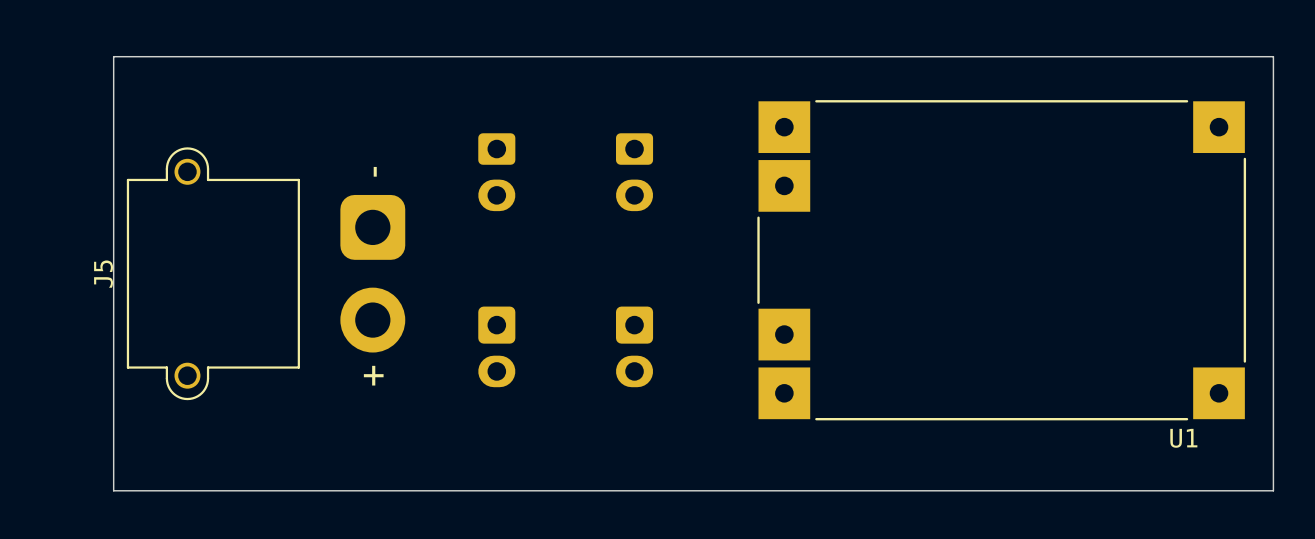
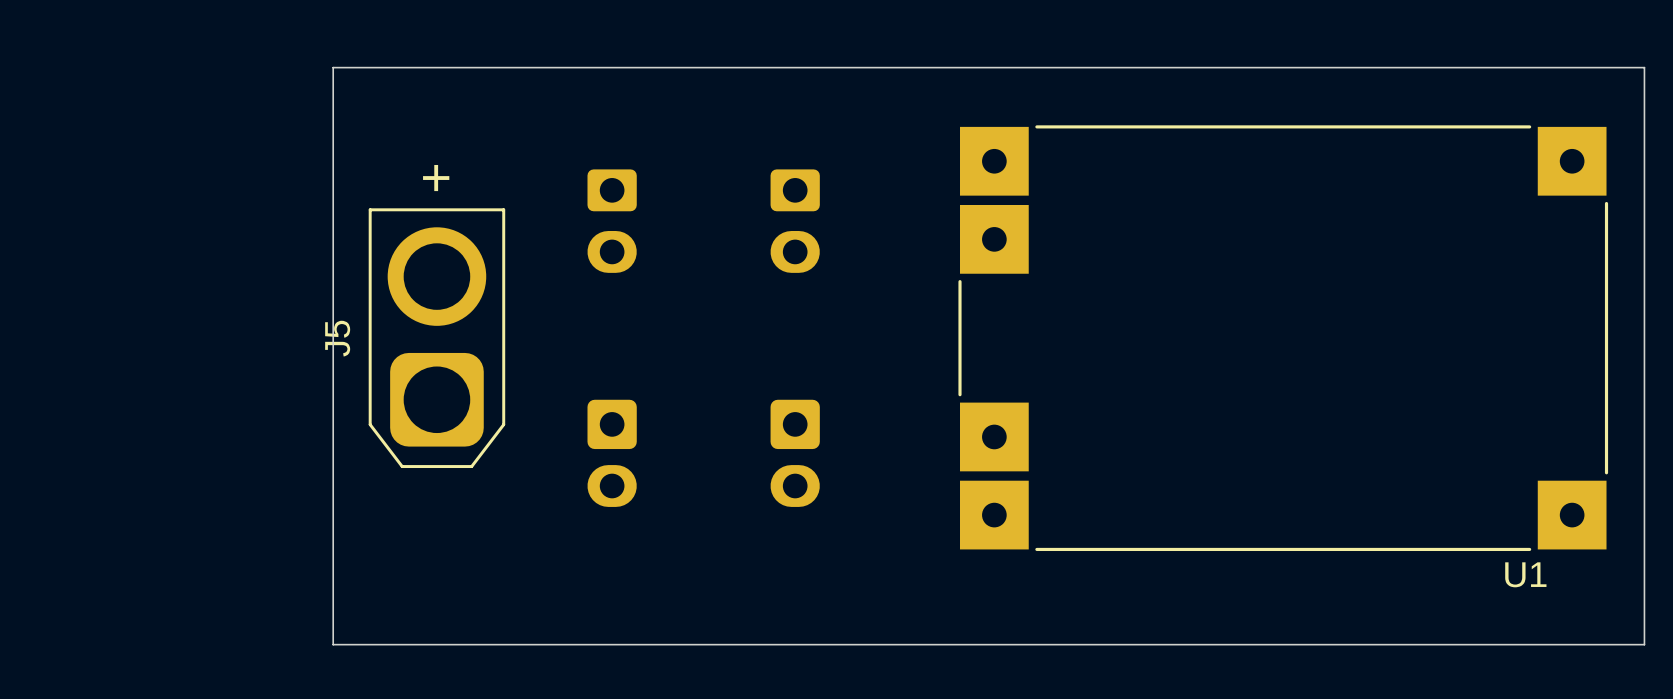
board edge: (286, 56) (113, 56) (113, 490) (286, 490) -> (333, 67) (333, 644)
J5 footprint: [126, 147, 406, 401] -> [368, 208, 506, 469]
J5 name position: J5 (103, 274) -> J5 (337, 338)

